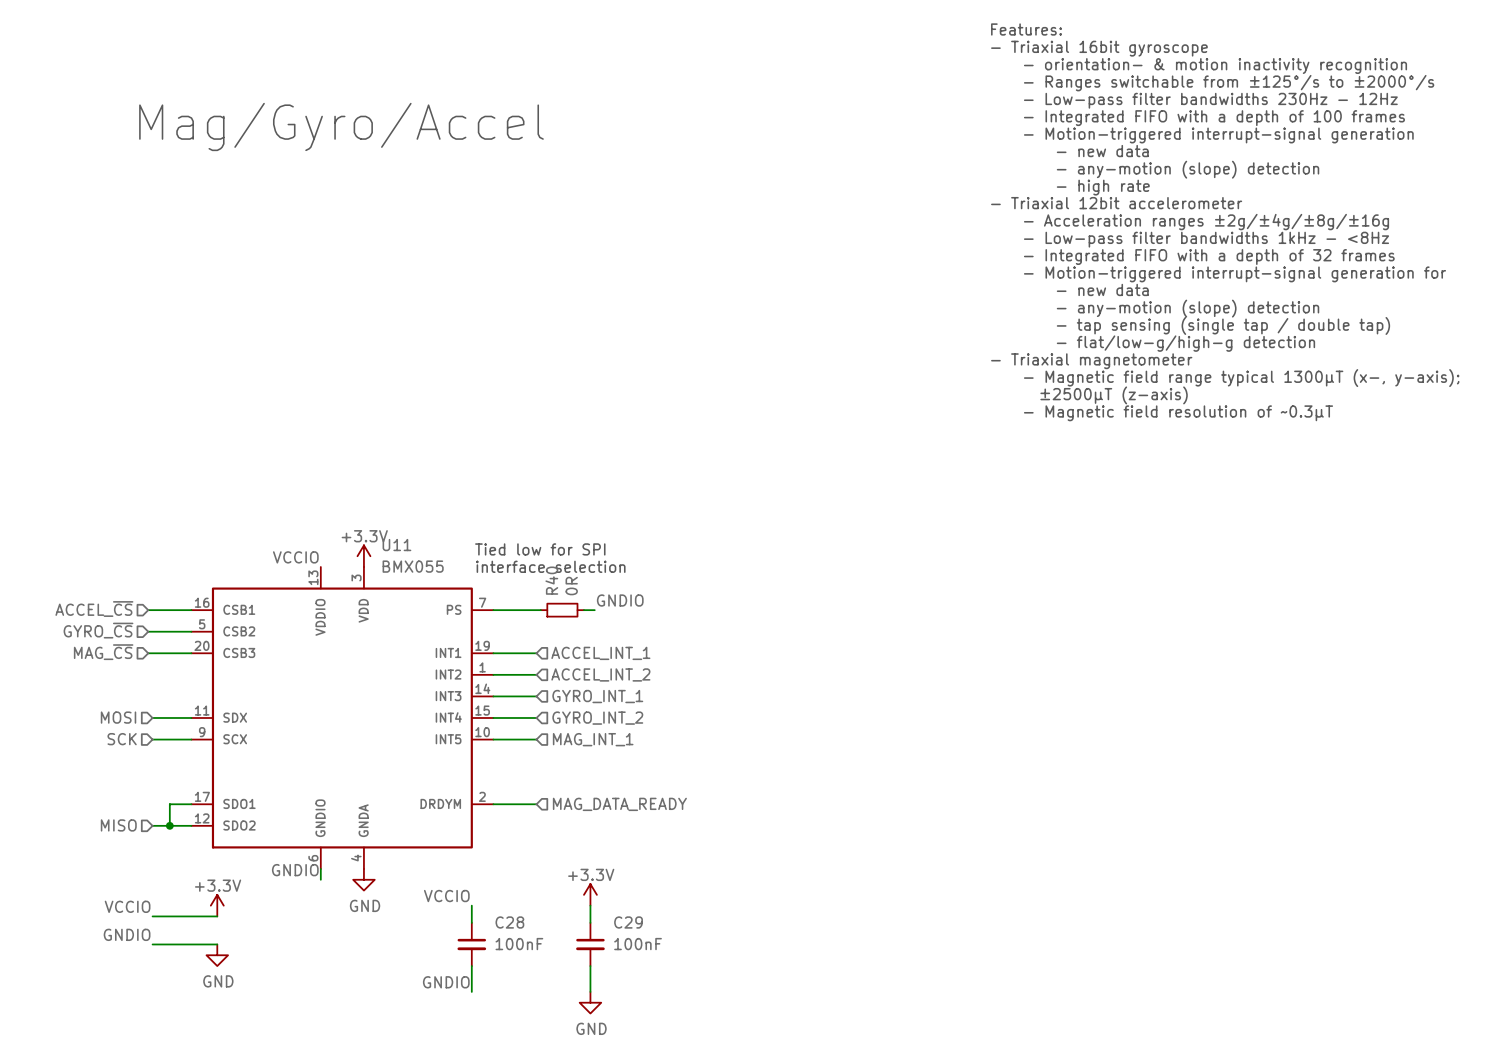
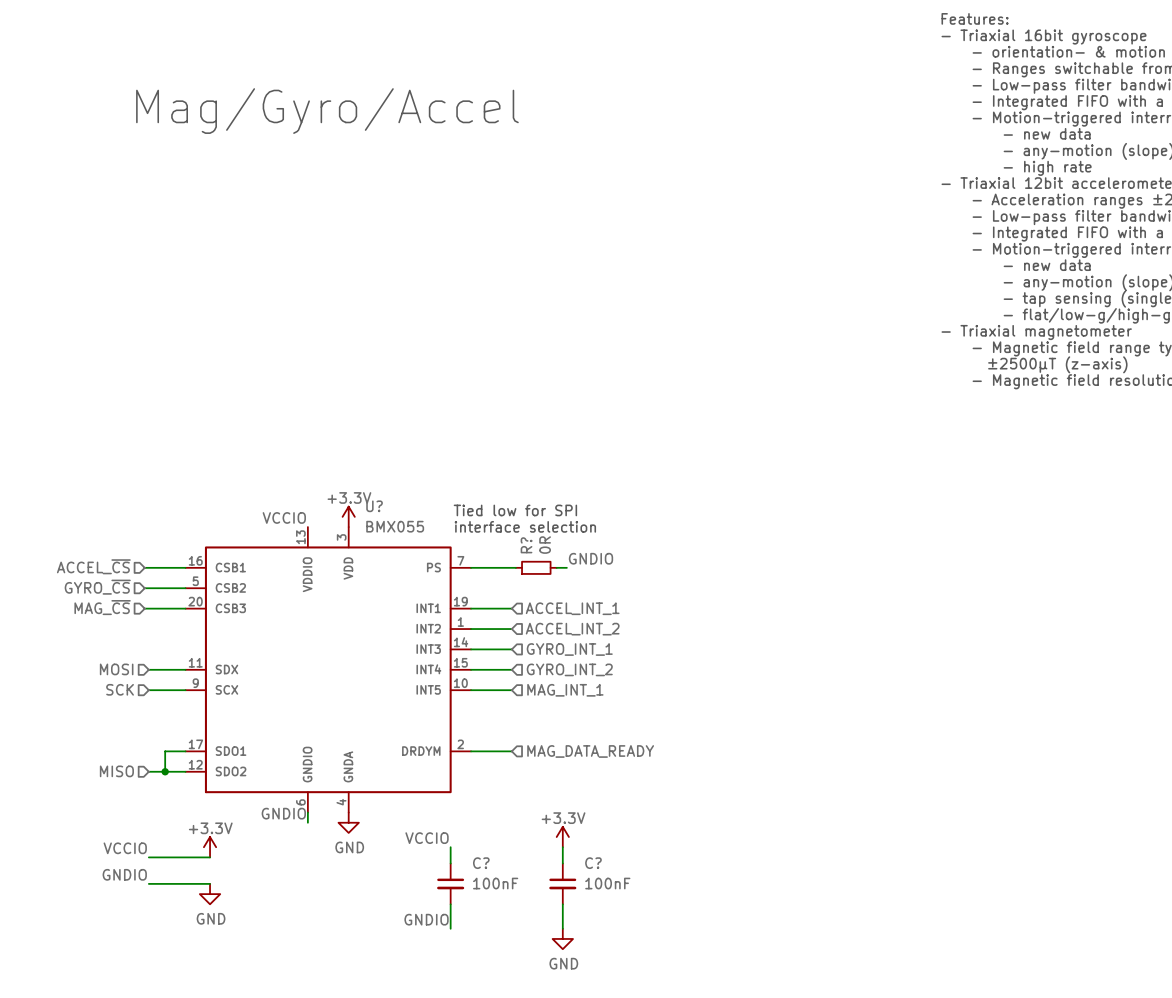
U11 name: U11 (396, 545) -> U? (374, 506)
R40 name: R40 (551, 580) -> R? (526, 545)
C28 name: C28 (509, 922) -> C? (481, 863)
C29 name: C29 (628, 922) -> C? (593, 863)

